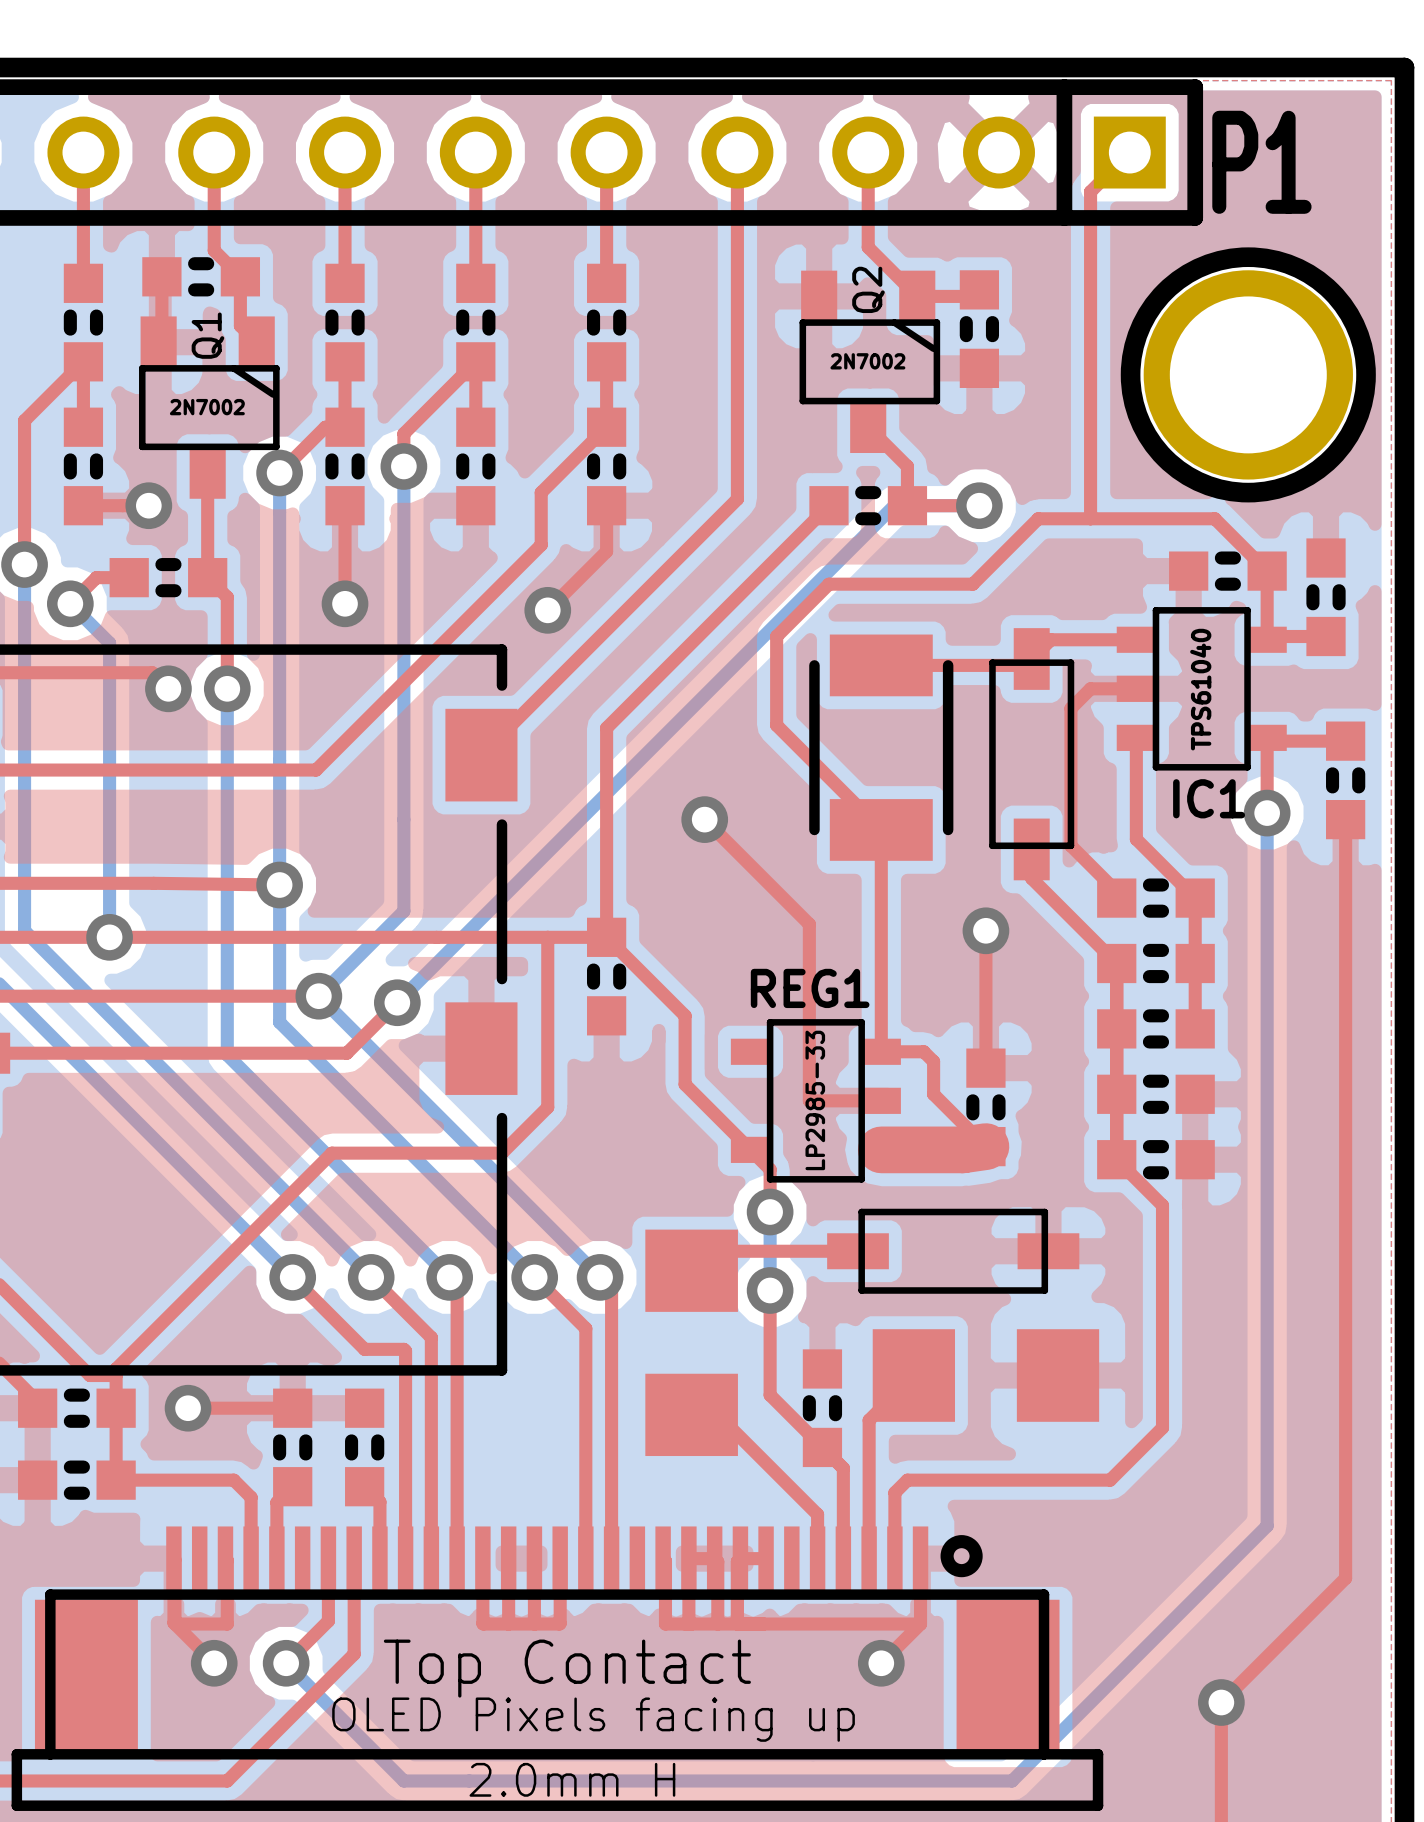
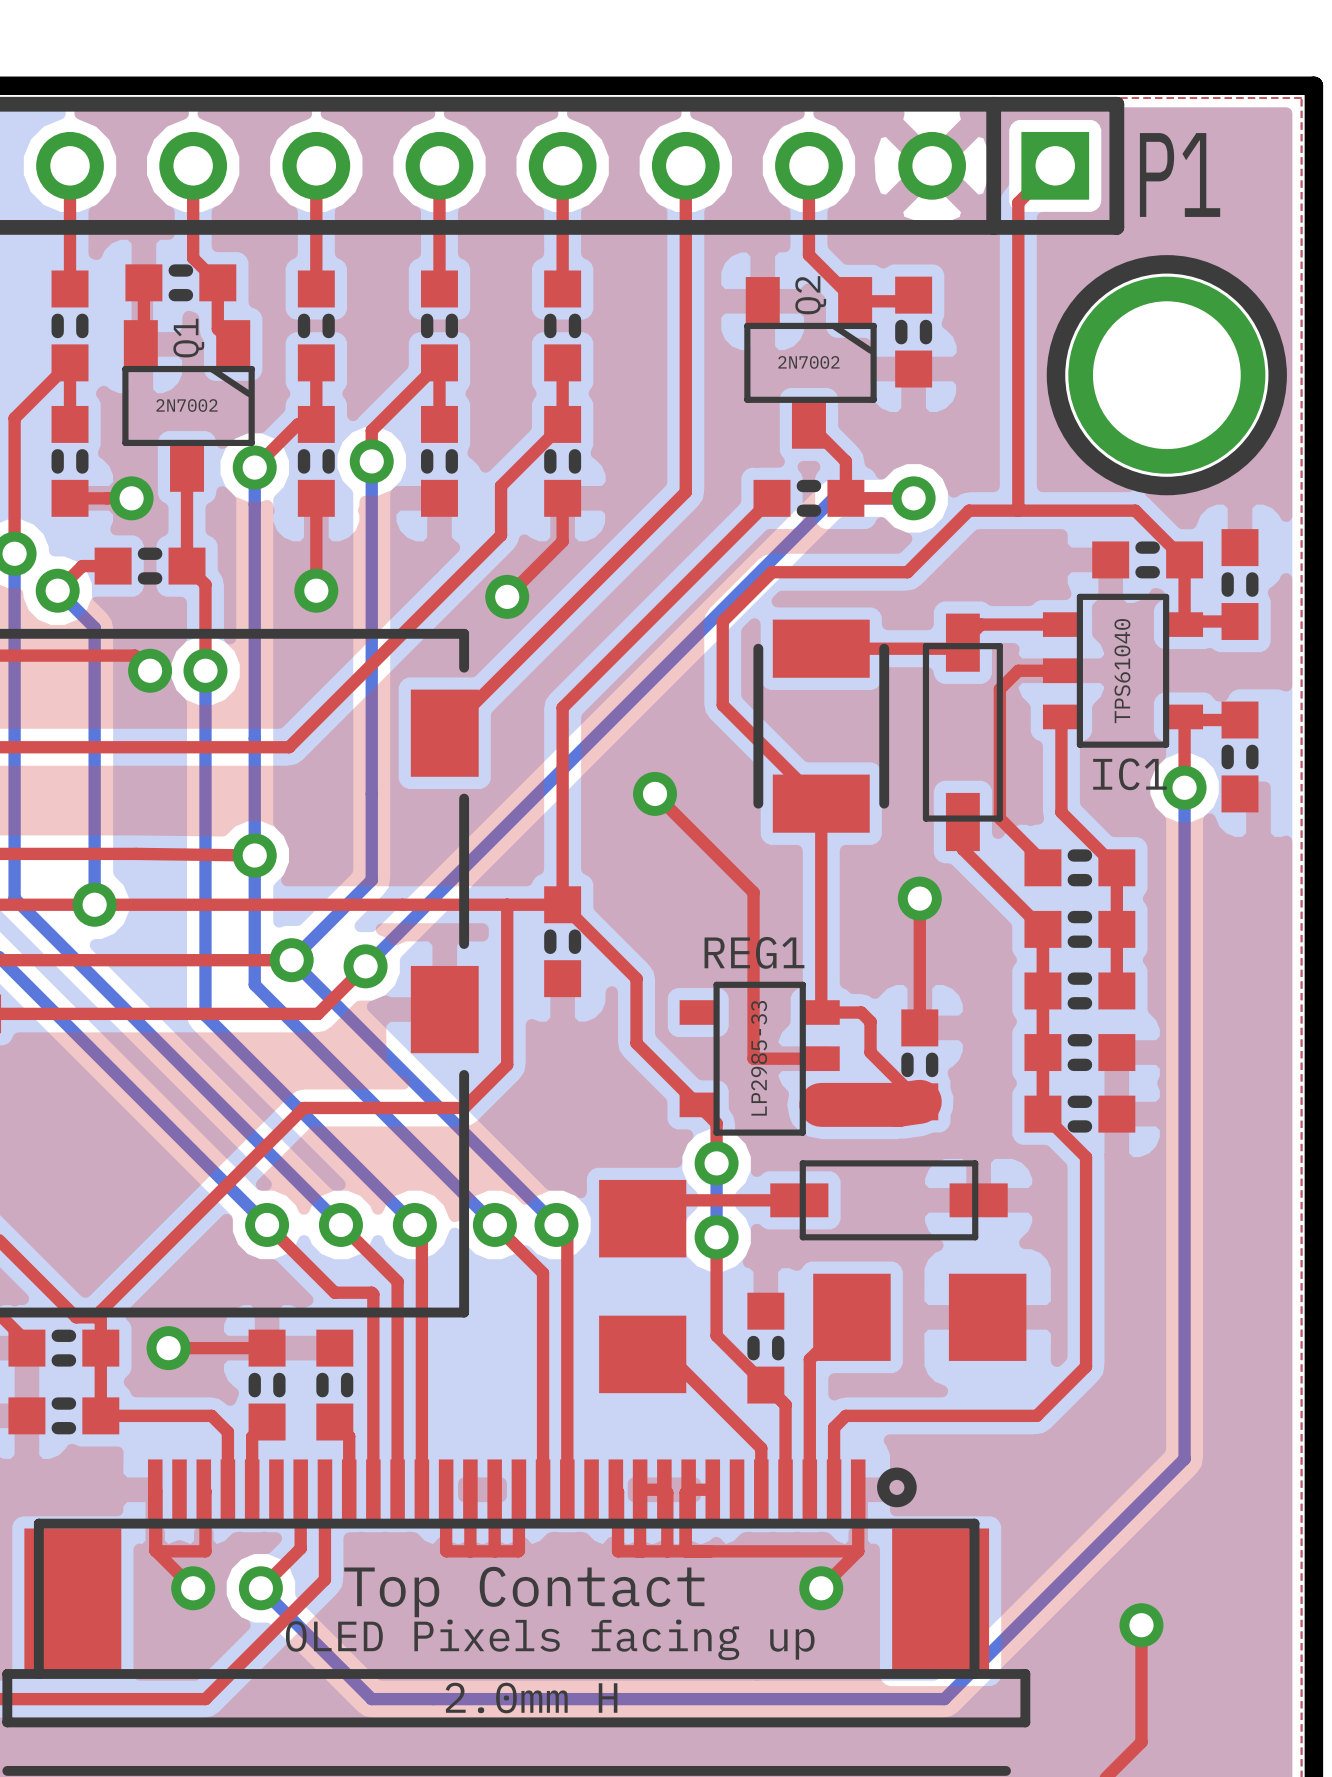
part position: (1345, 780) -> (1240, 756)
top track: (1345, 819) (1345, 1578) (1221, 1702) -> none

